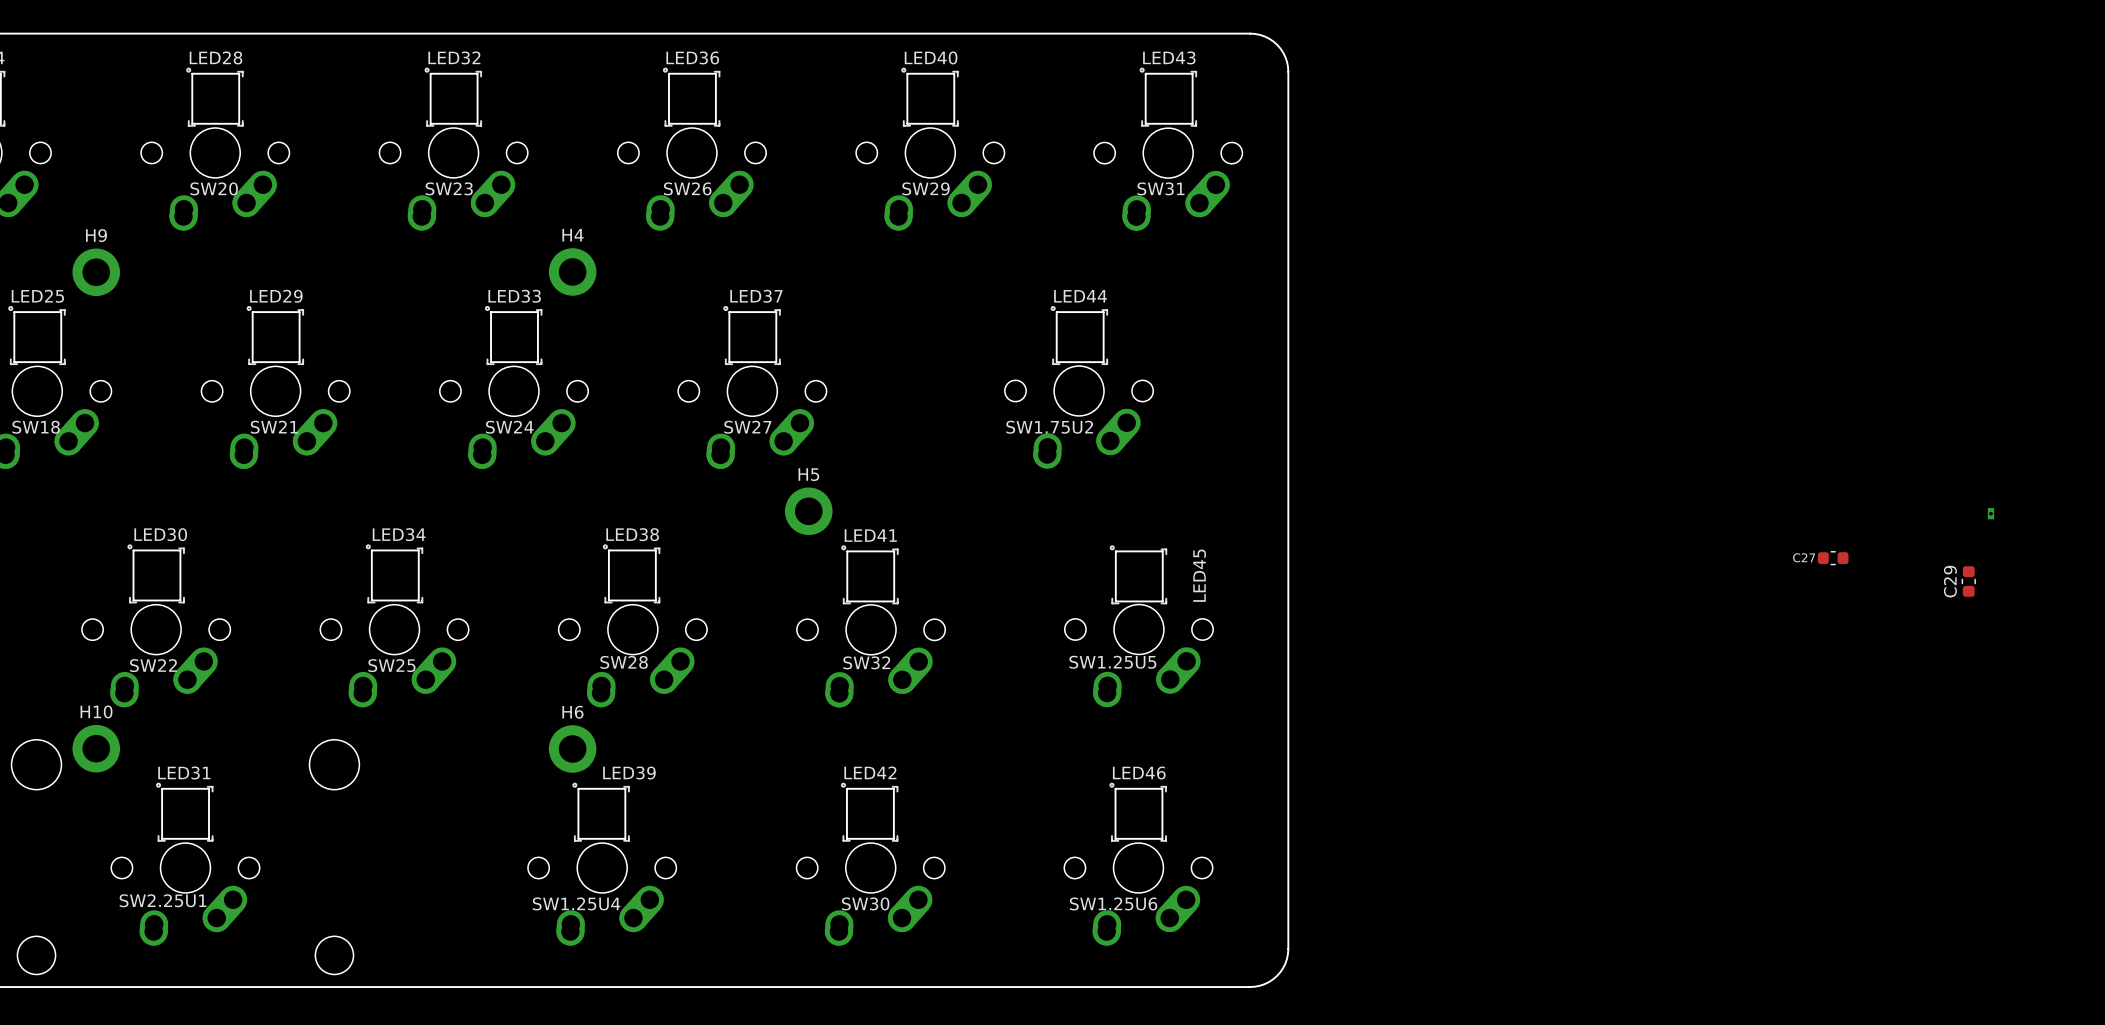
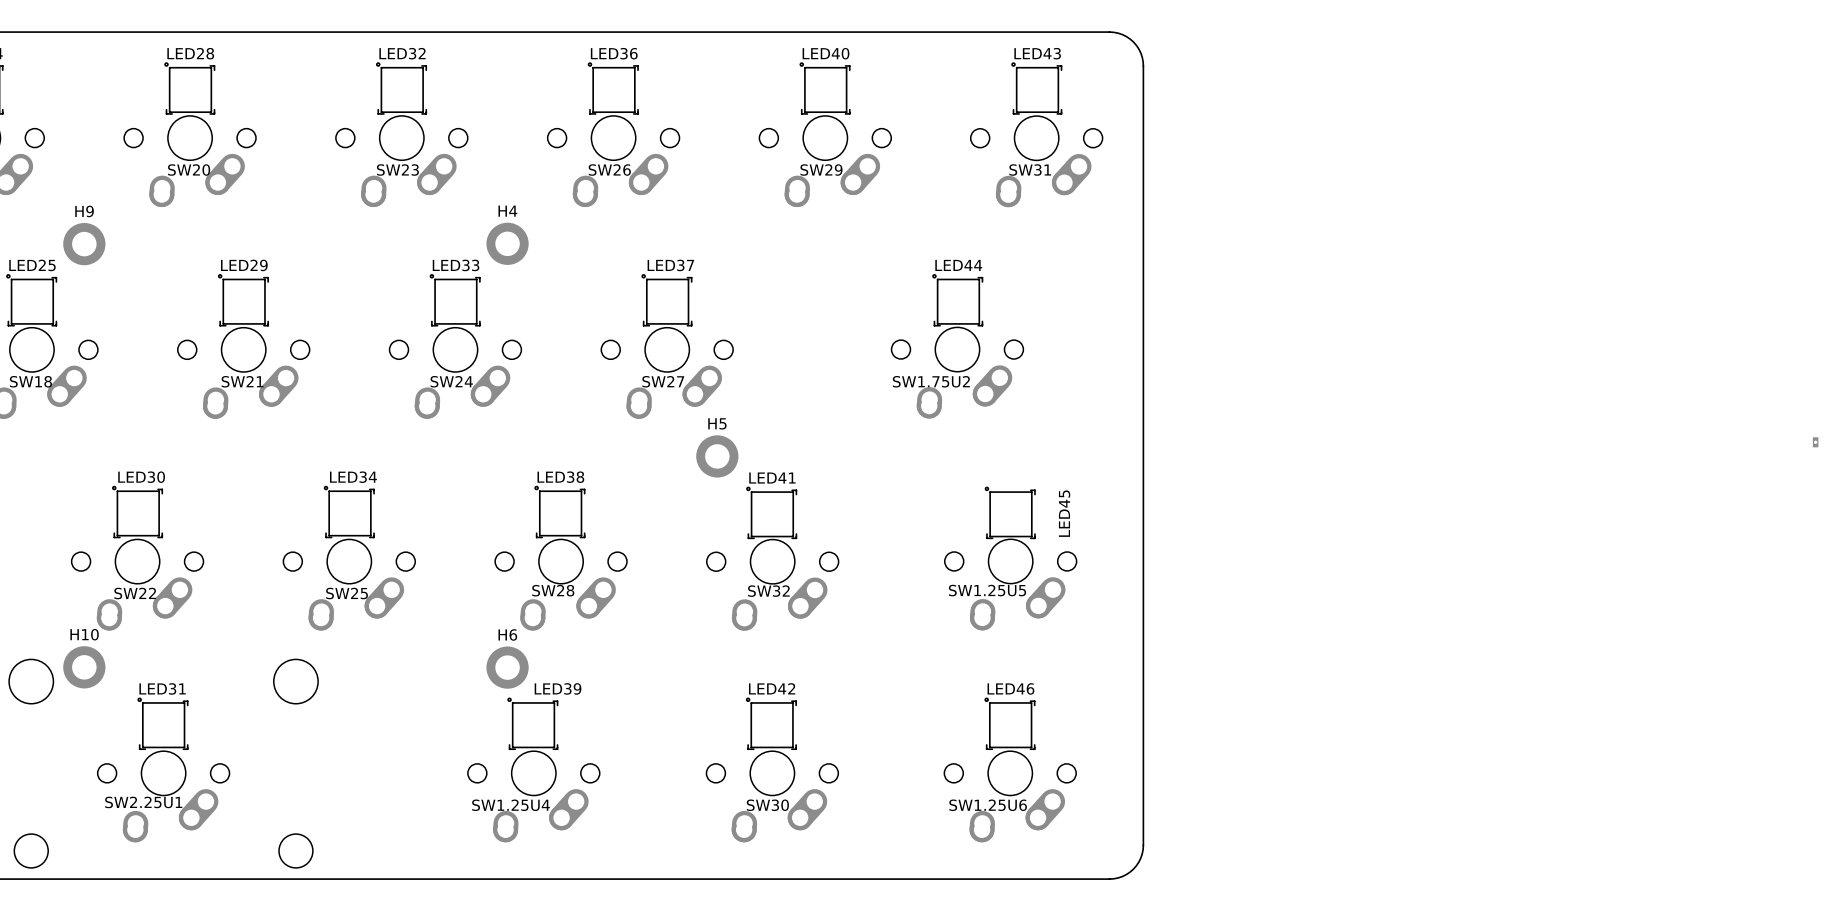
part position: (1990, 513) -> (1815, 442)
C27: (1833, 558) -> none
C29: (1968, 581) -> none

